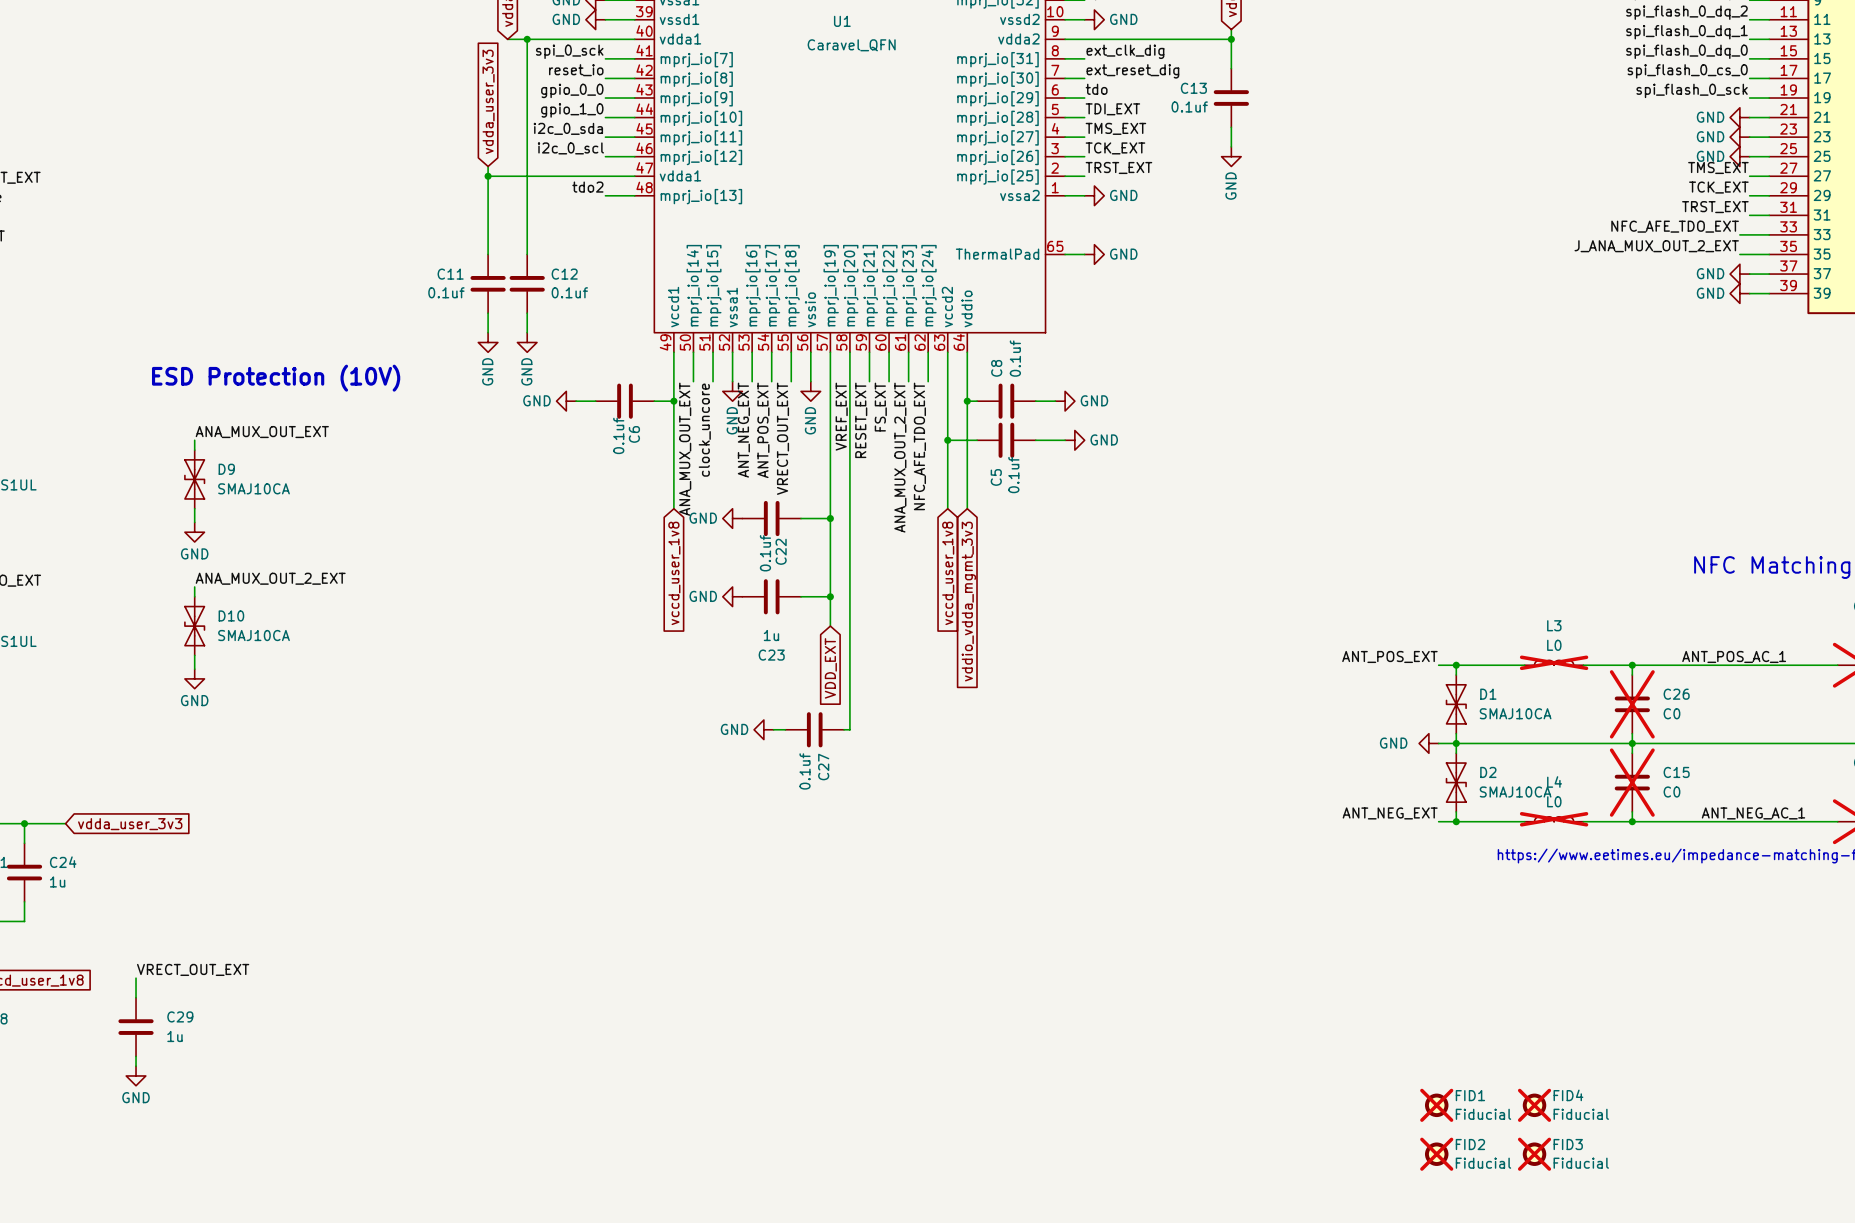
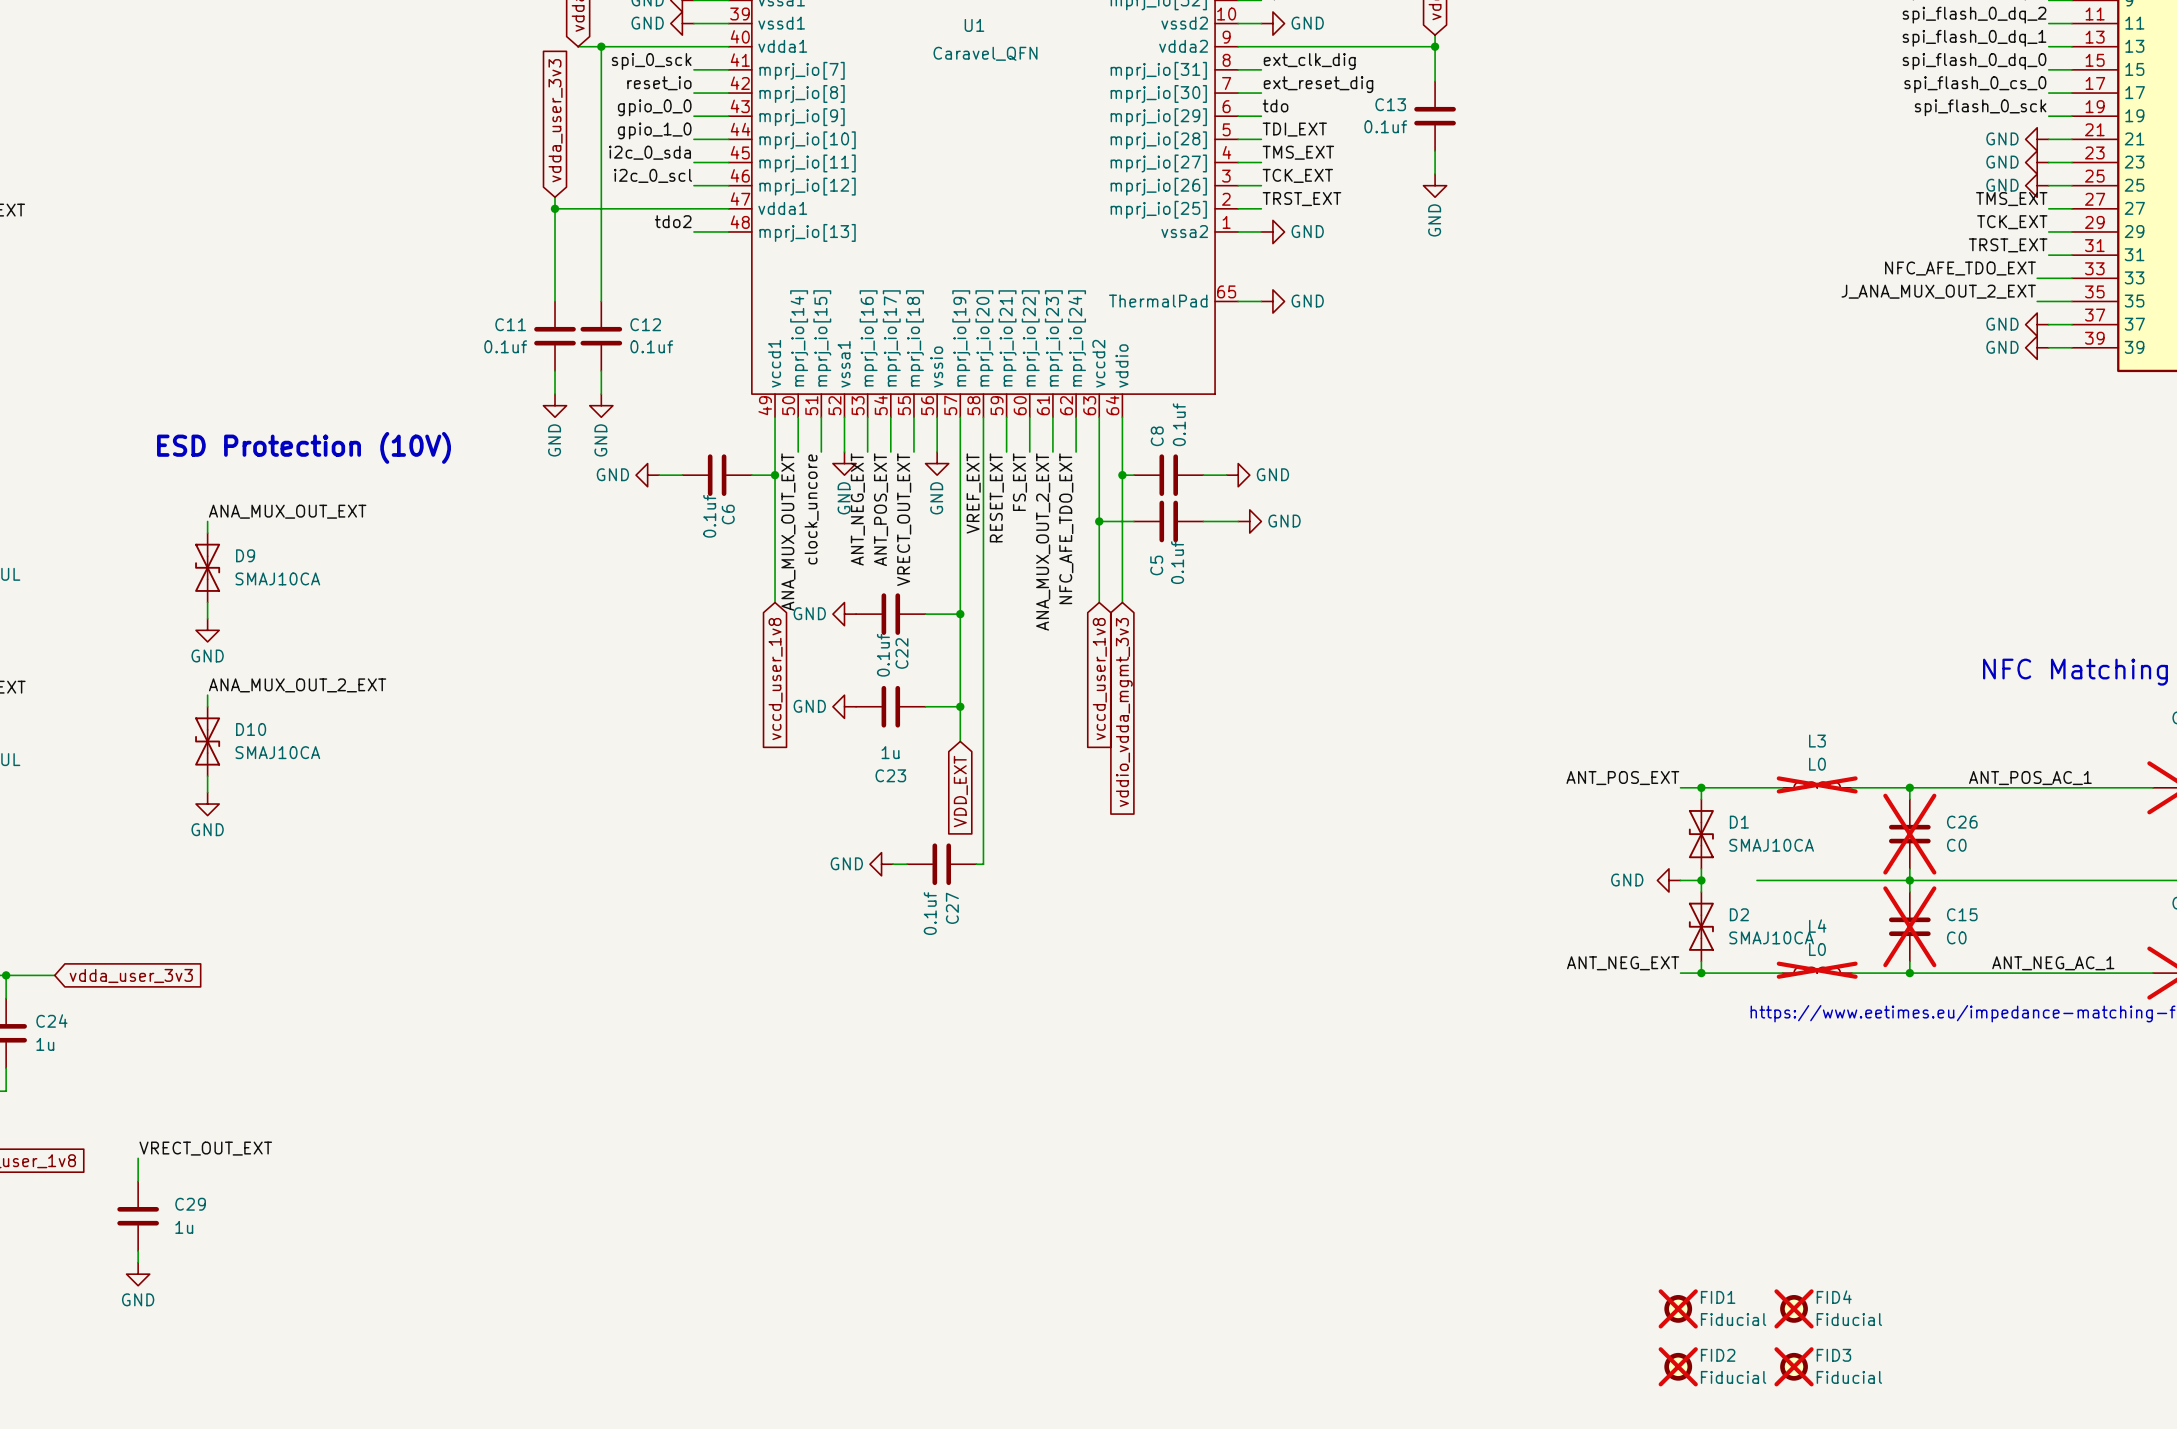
wire: (1456, 743) (1503, 743) -> none

